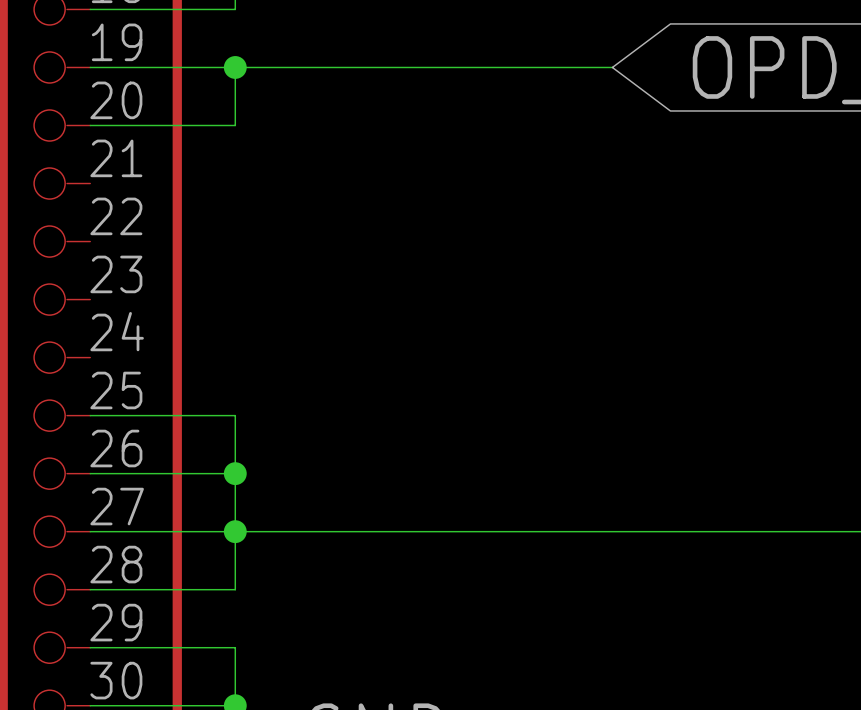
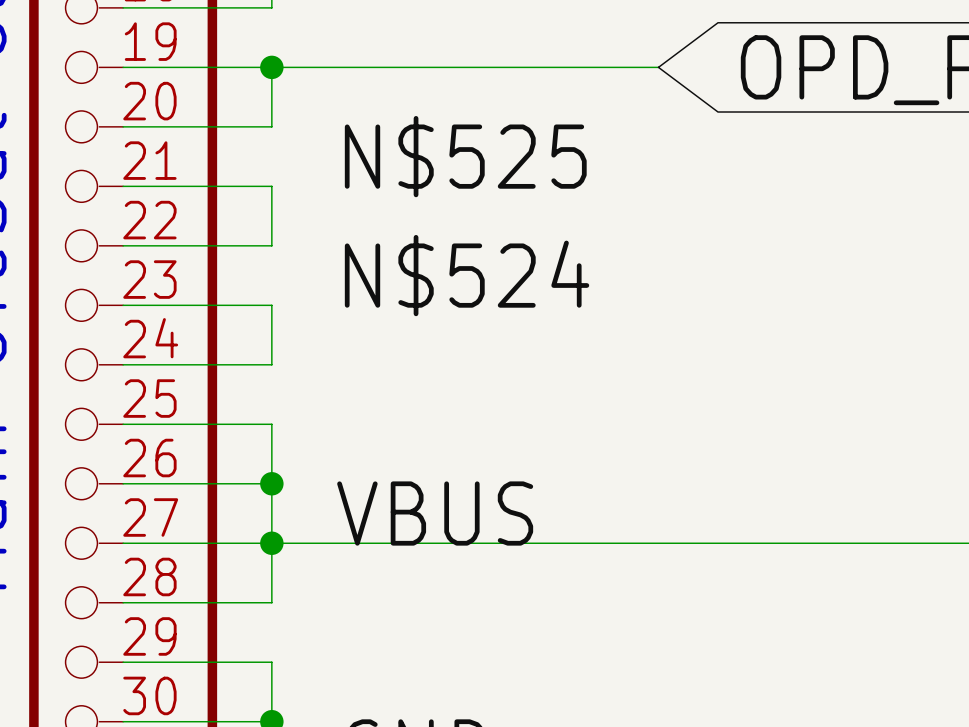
label: none -> N$525 (465, 156)
wire: none -> (123, 186) (271, 186) (271, 245) (123, 245)
label: none -> N$524 (467, 275)
wire: none -> (123, 305) (271, 305) (271, 364) (123, 364)
label: none -> VBUS (435, 513)

